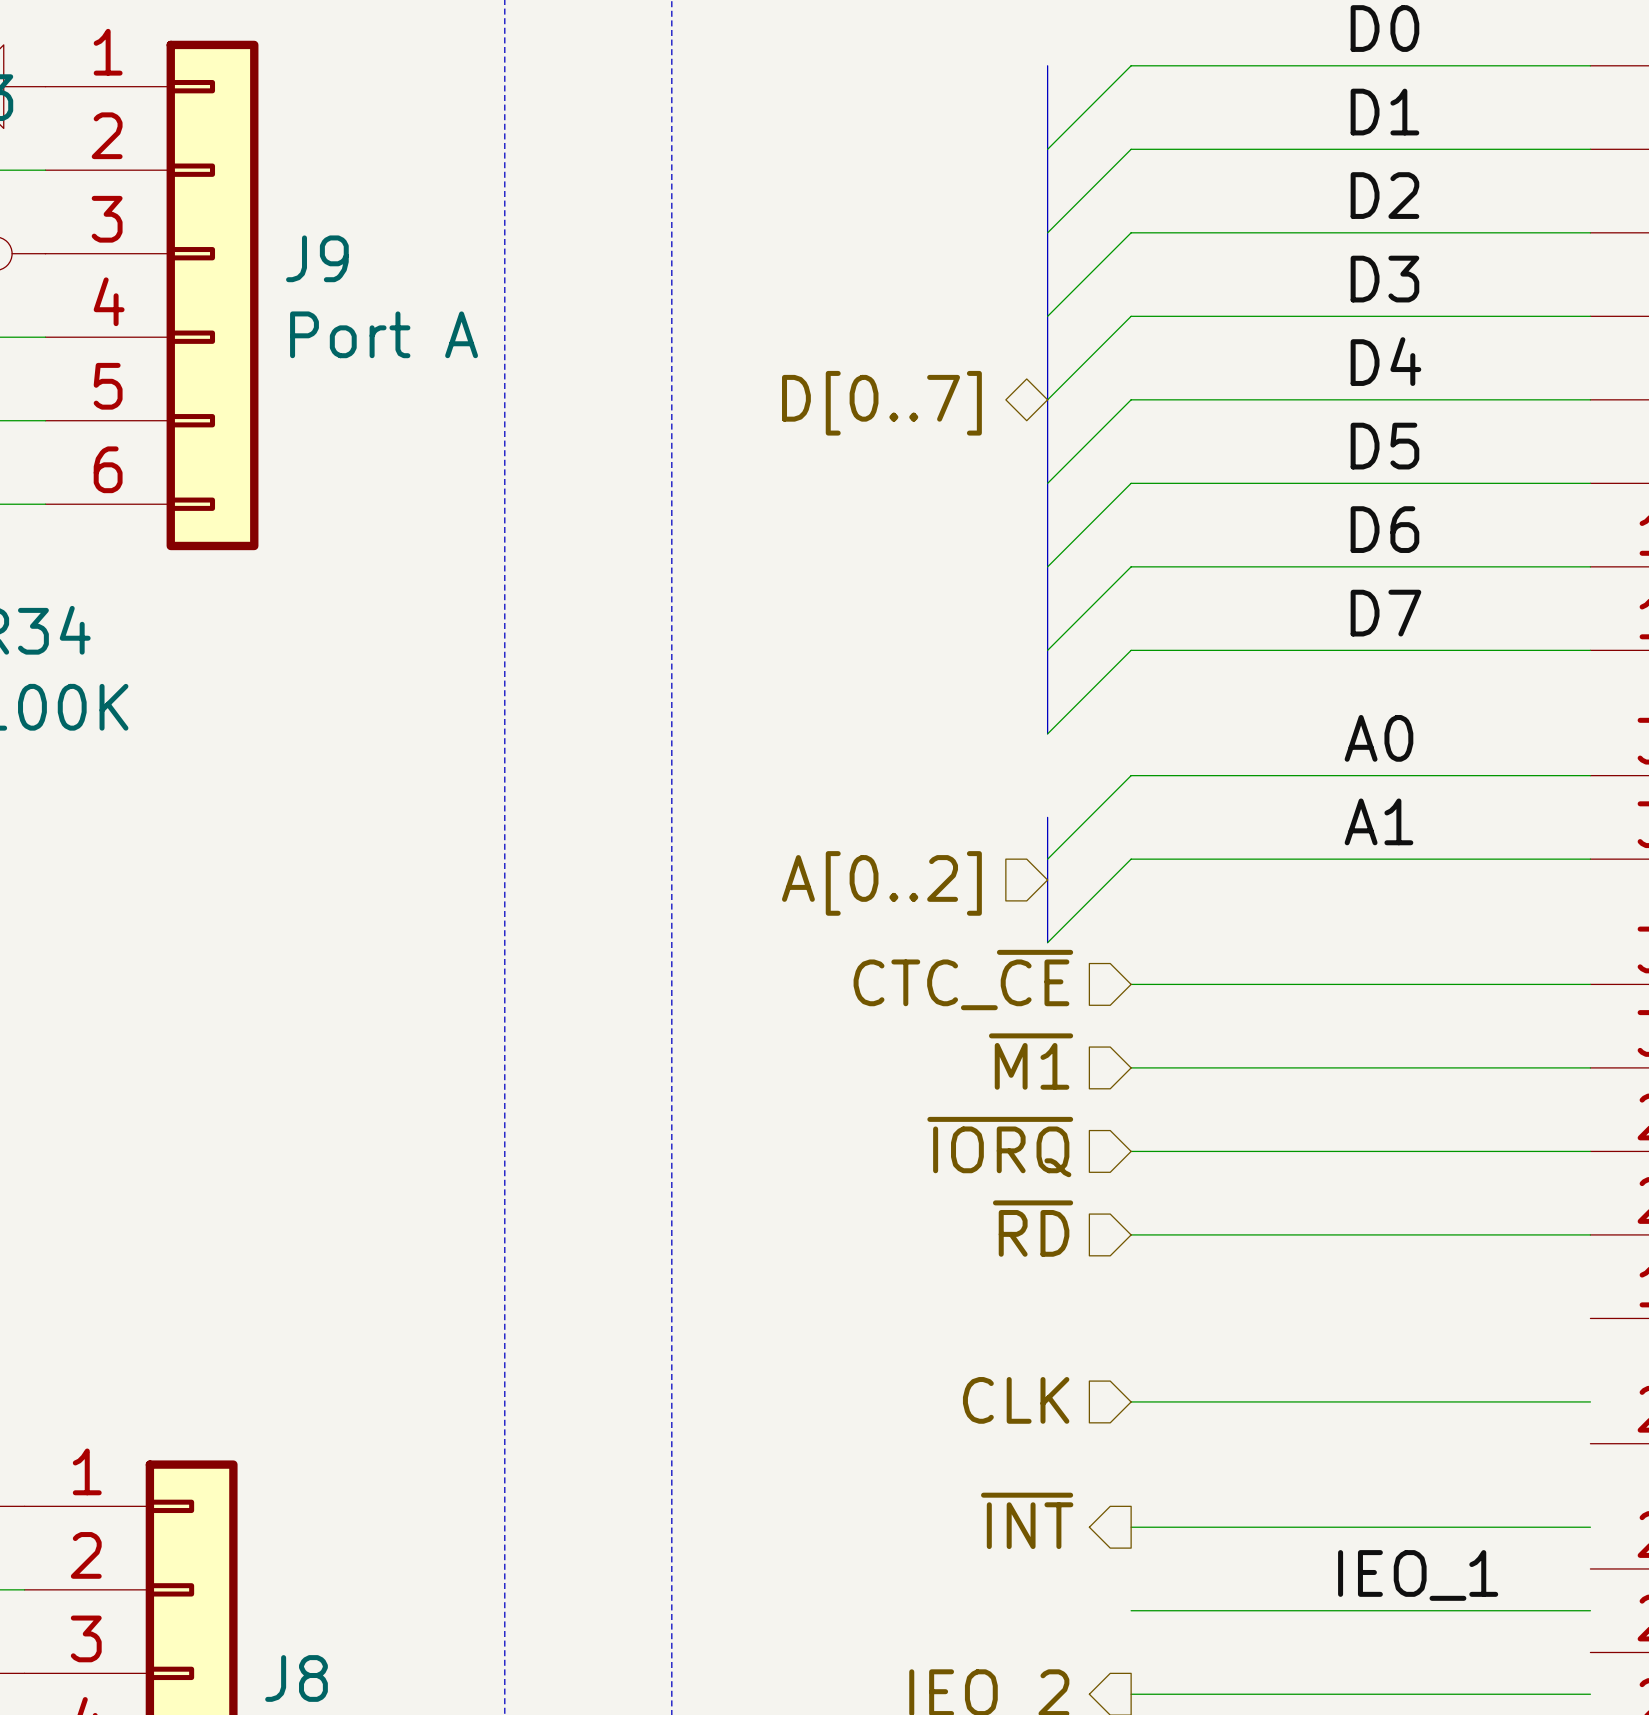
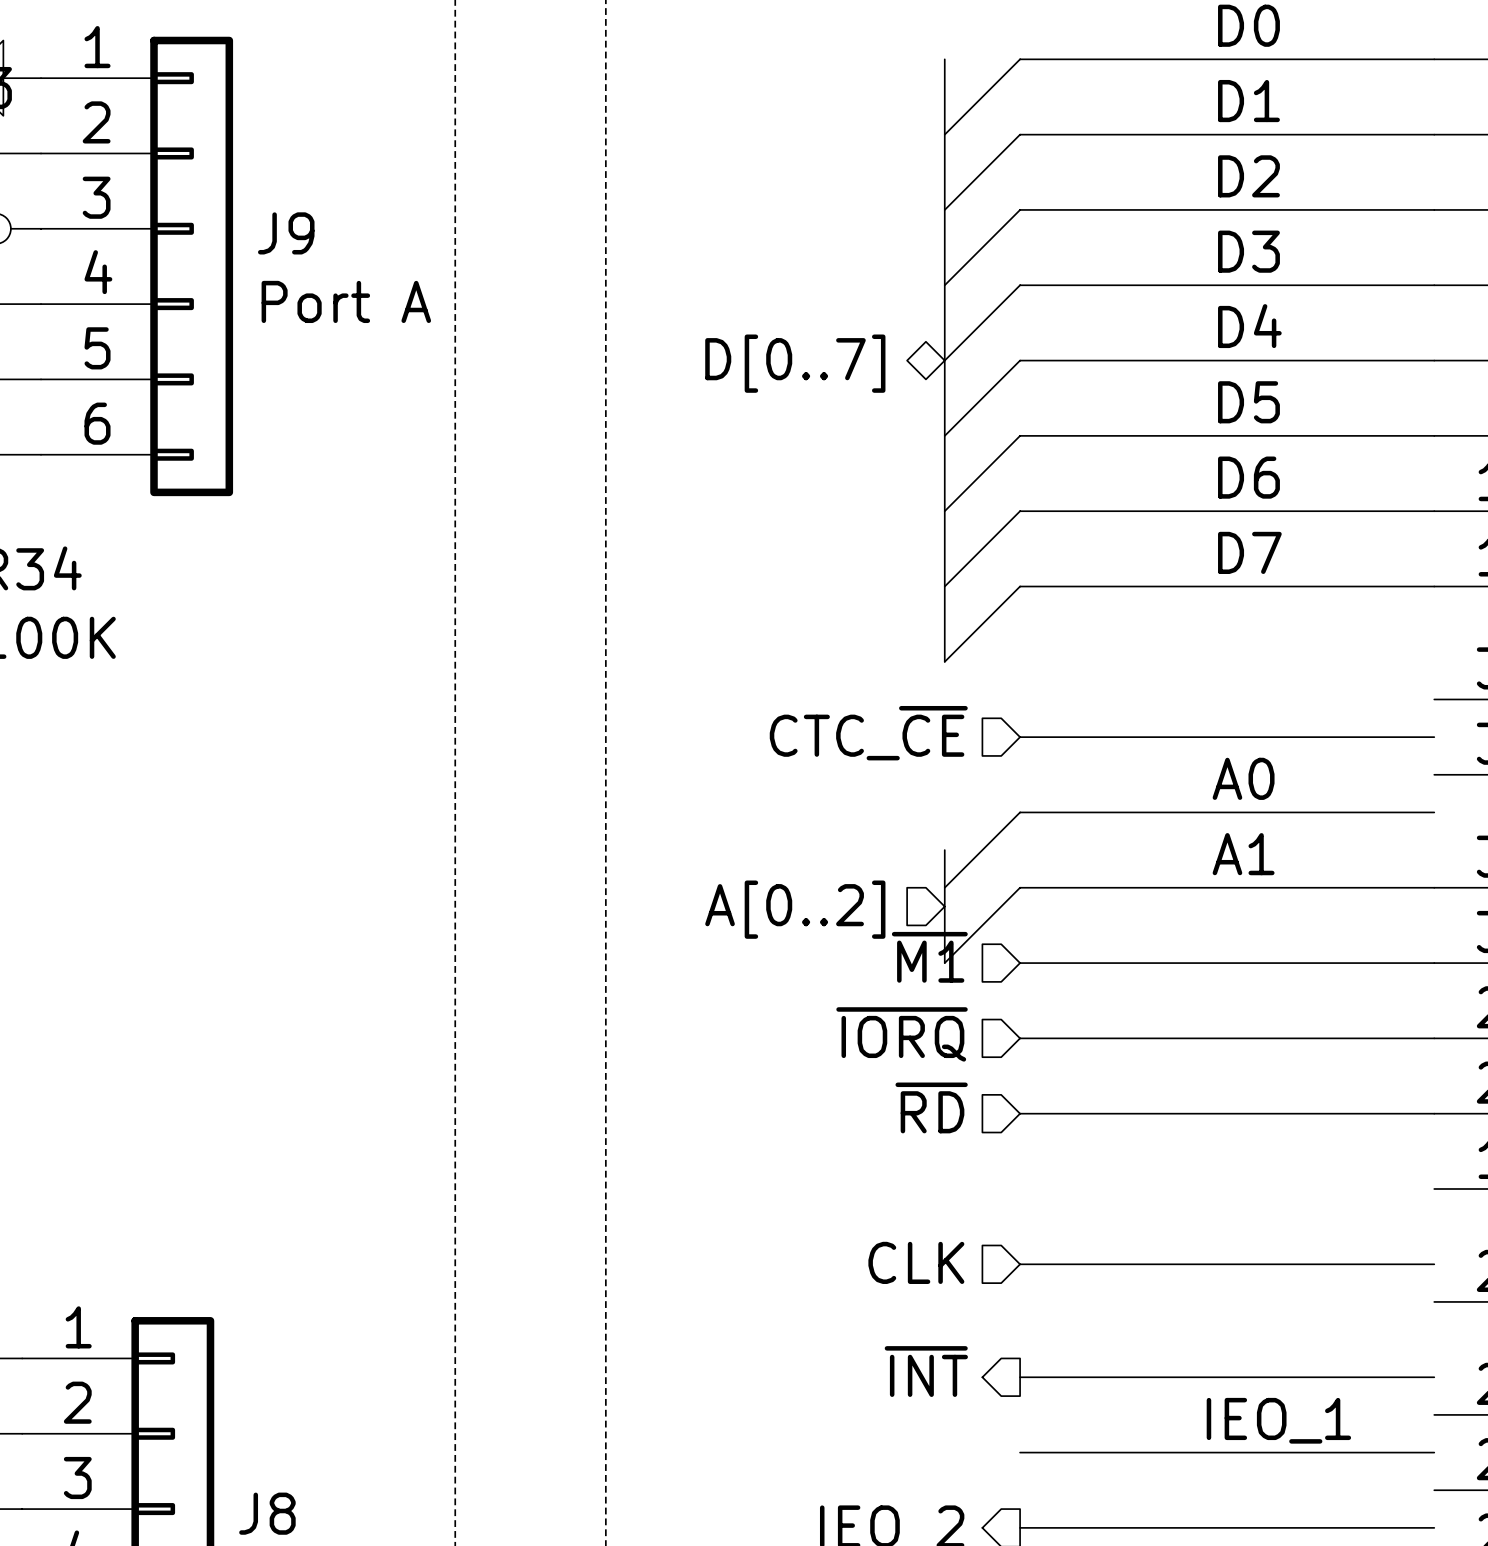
label position: A0 (1378, 738) -> A0 (1243, 778)
wire: (1590, 775) (1131, 775) (1047, 859) -> none
bus: (1047, 817) (1047, 942) -> (944, 963) (944, 850)
wire: none -> (1020, 737) (1434, 737)
label position: A1 (1378, 821) -> A1 (1243, 854)
wire: (1590, 859) (1131, 859) (1047, 942) -> (1434, 812) (1020, 812) (944, 887)
hierarchical label position: A[0..2] (881, 883) -> A[0..2] (795, 909)
hierarchical label position: CTC_~{CE} (963, 980) -> CTC_~{CE} (868, 733)
wire: none -> (1020, 887) (944, 963)

